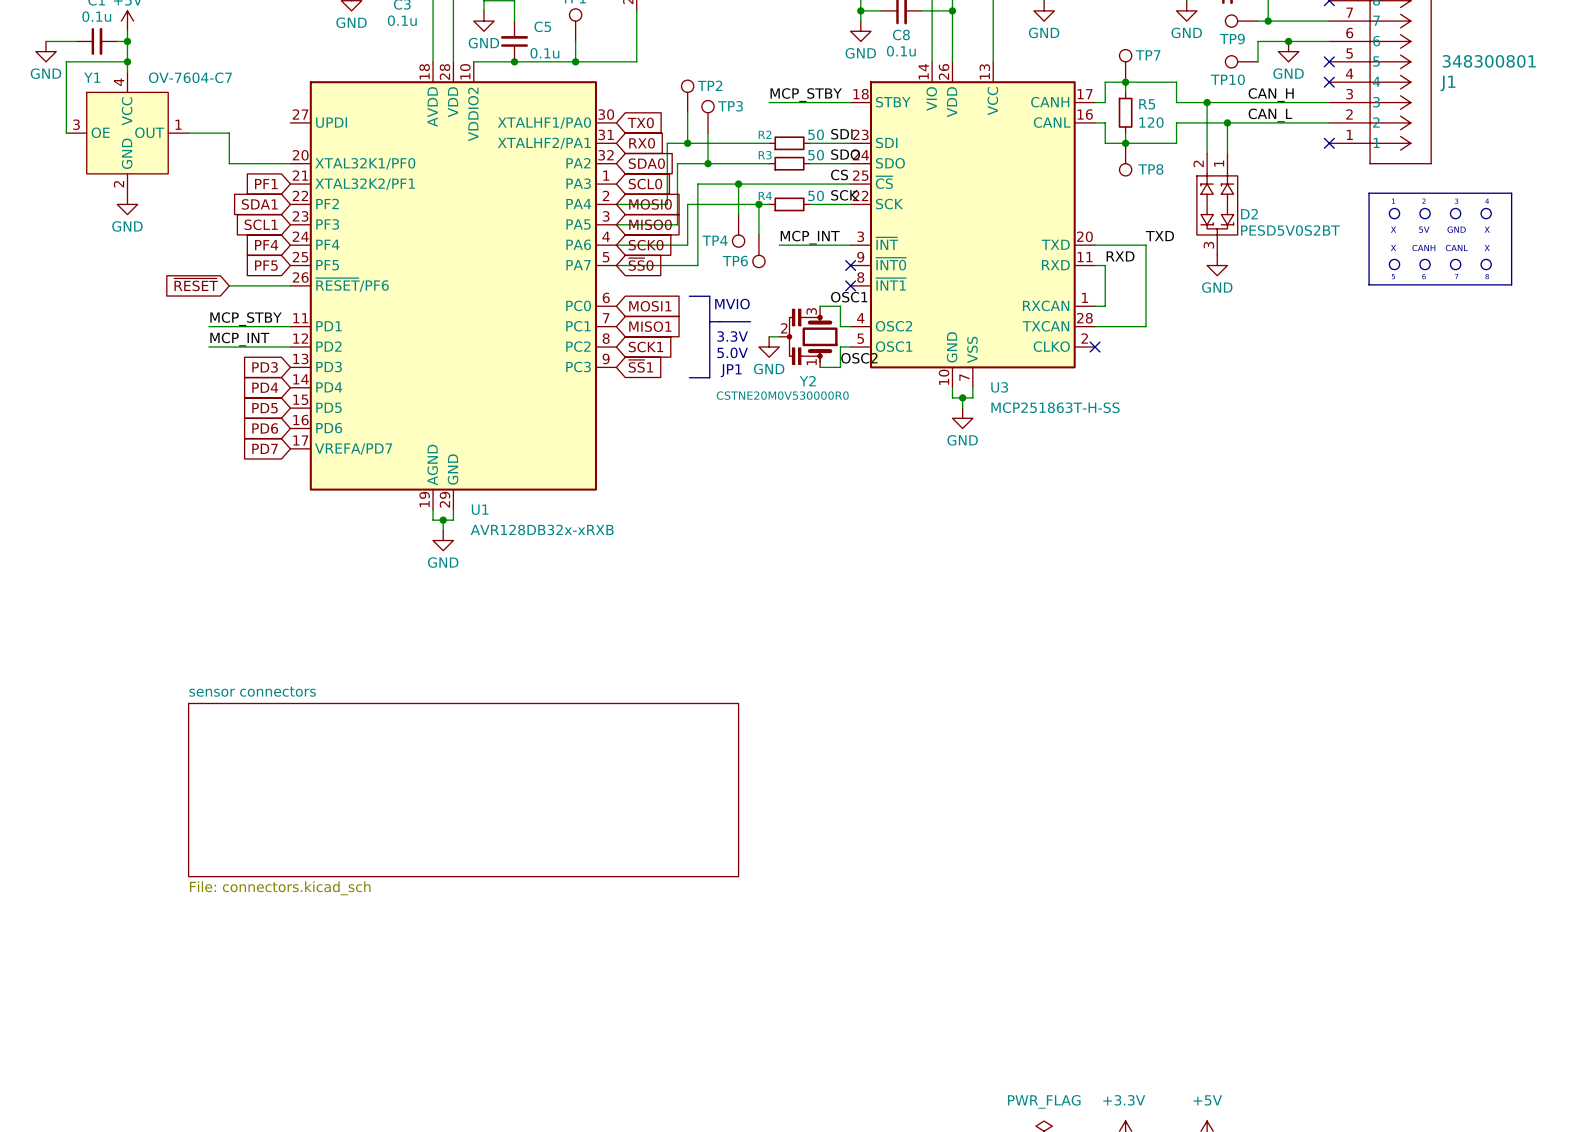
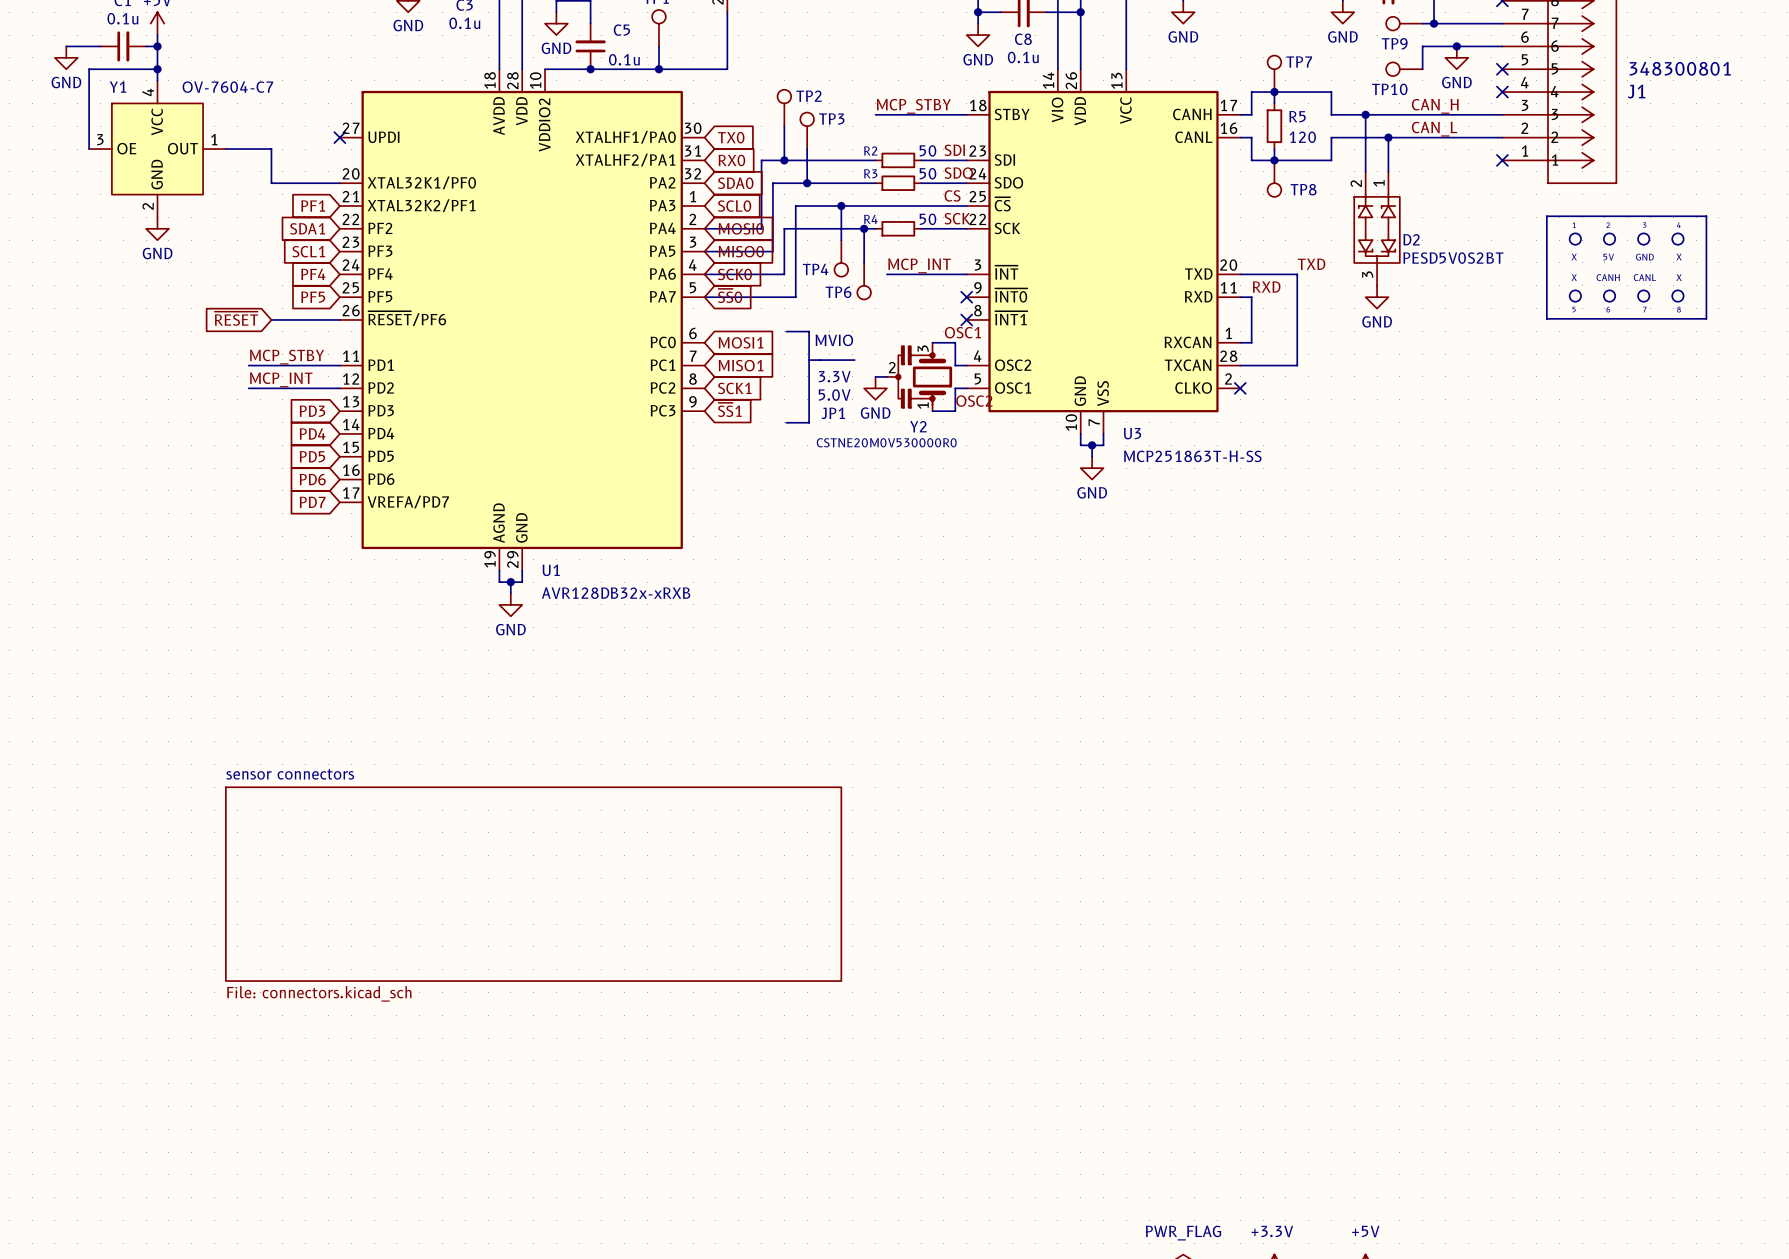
no-connect mark: none -> (339, 137)

